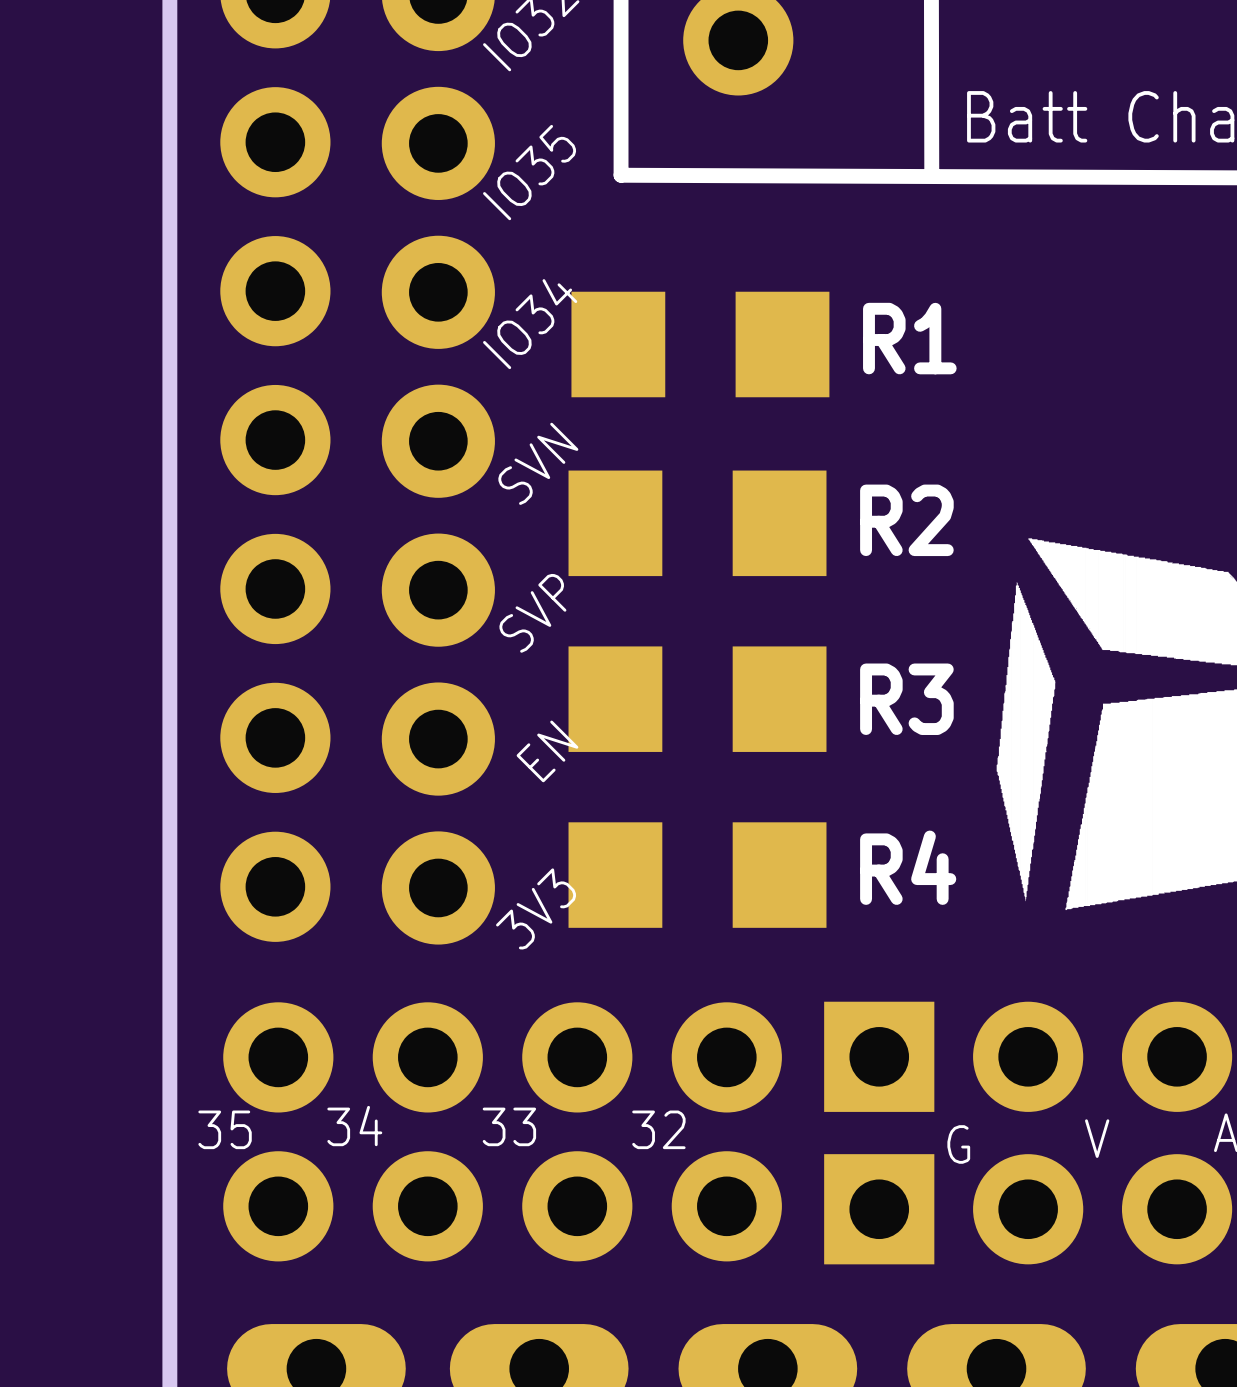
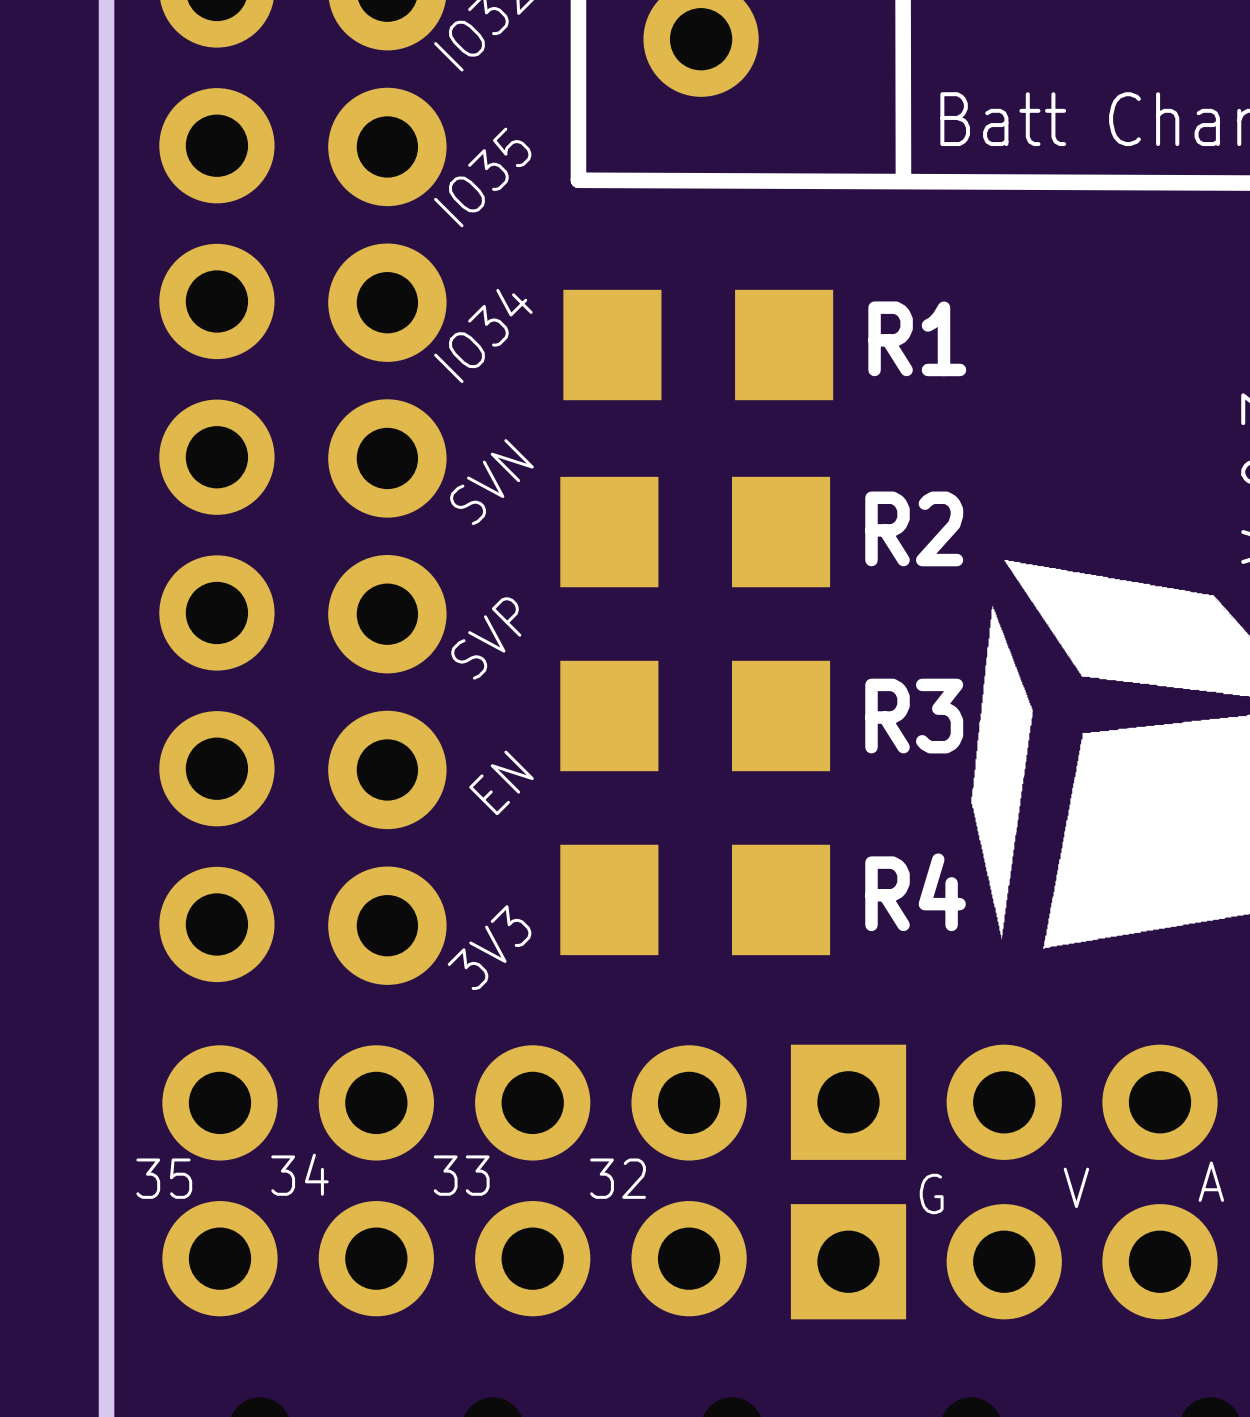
R1 position: (700, 344) -> (698, 345)
R2 position: (697, 523) -> (695, 532)
R3 position: (697, 699) -> (695, 715)
R4 position: (697, 875) -> (695, 899)

